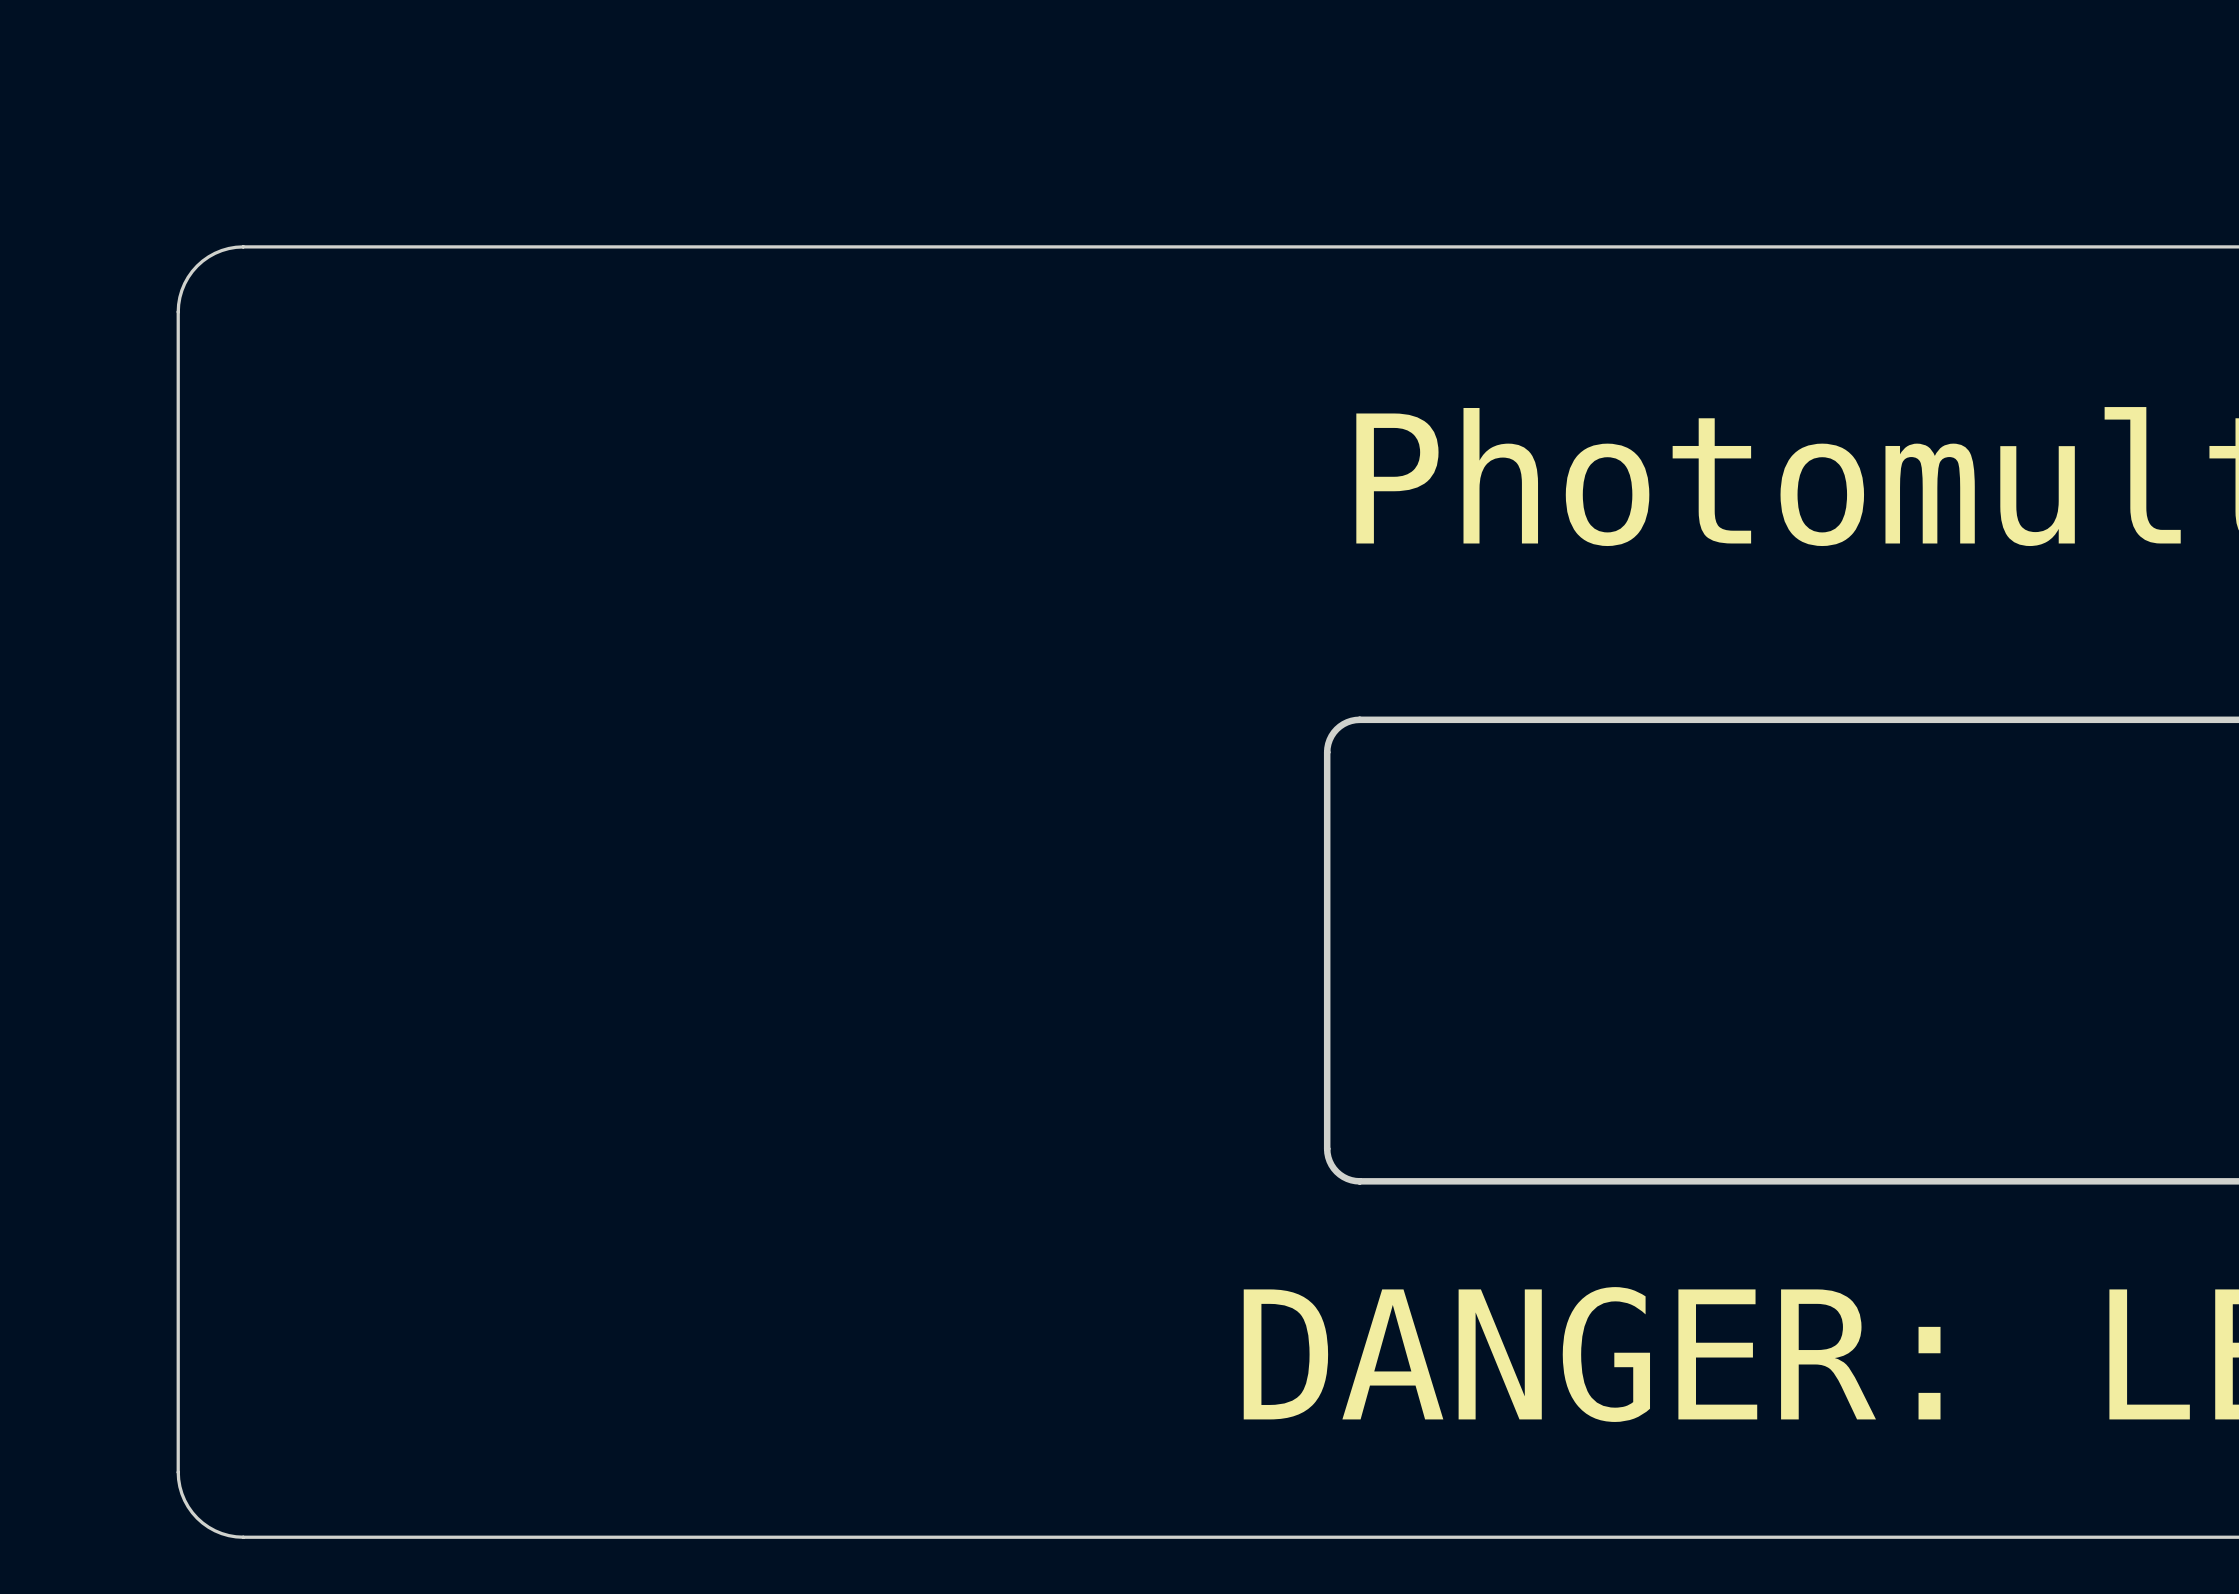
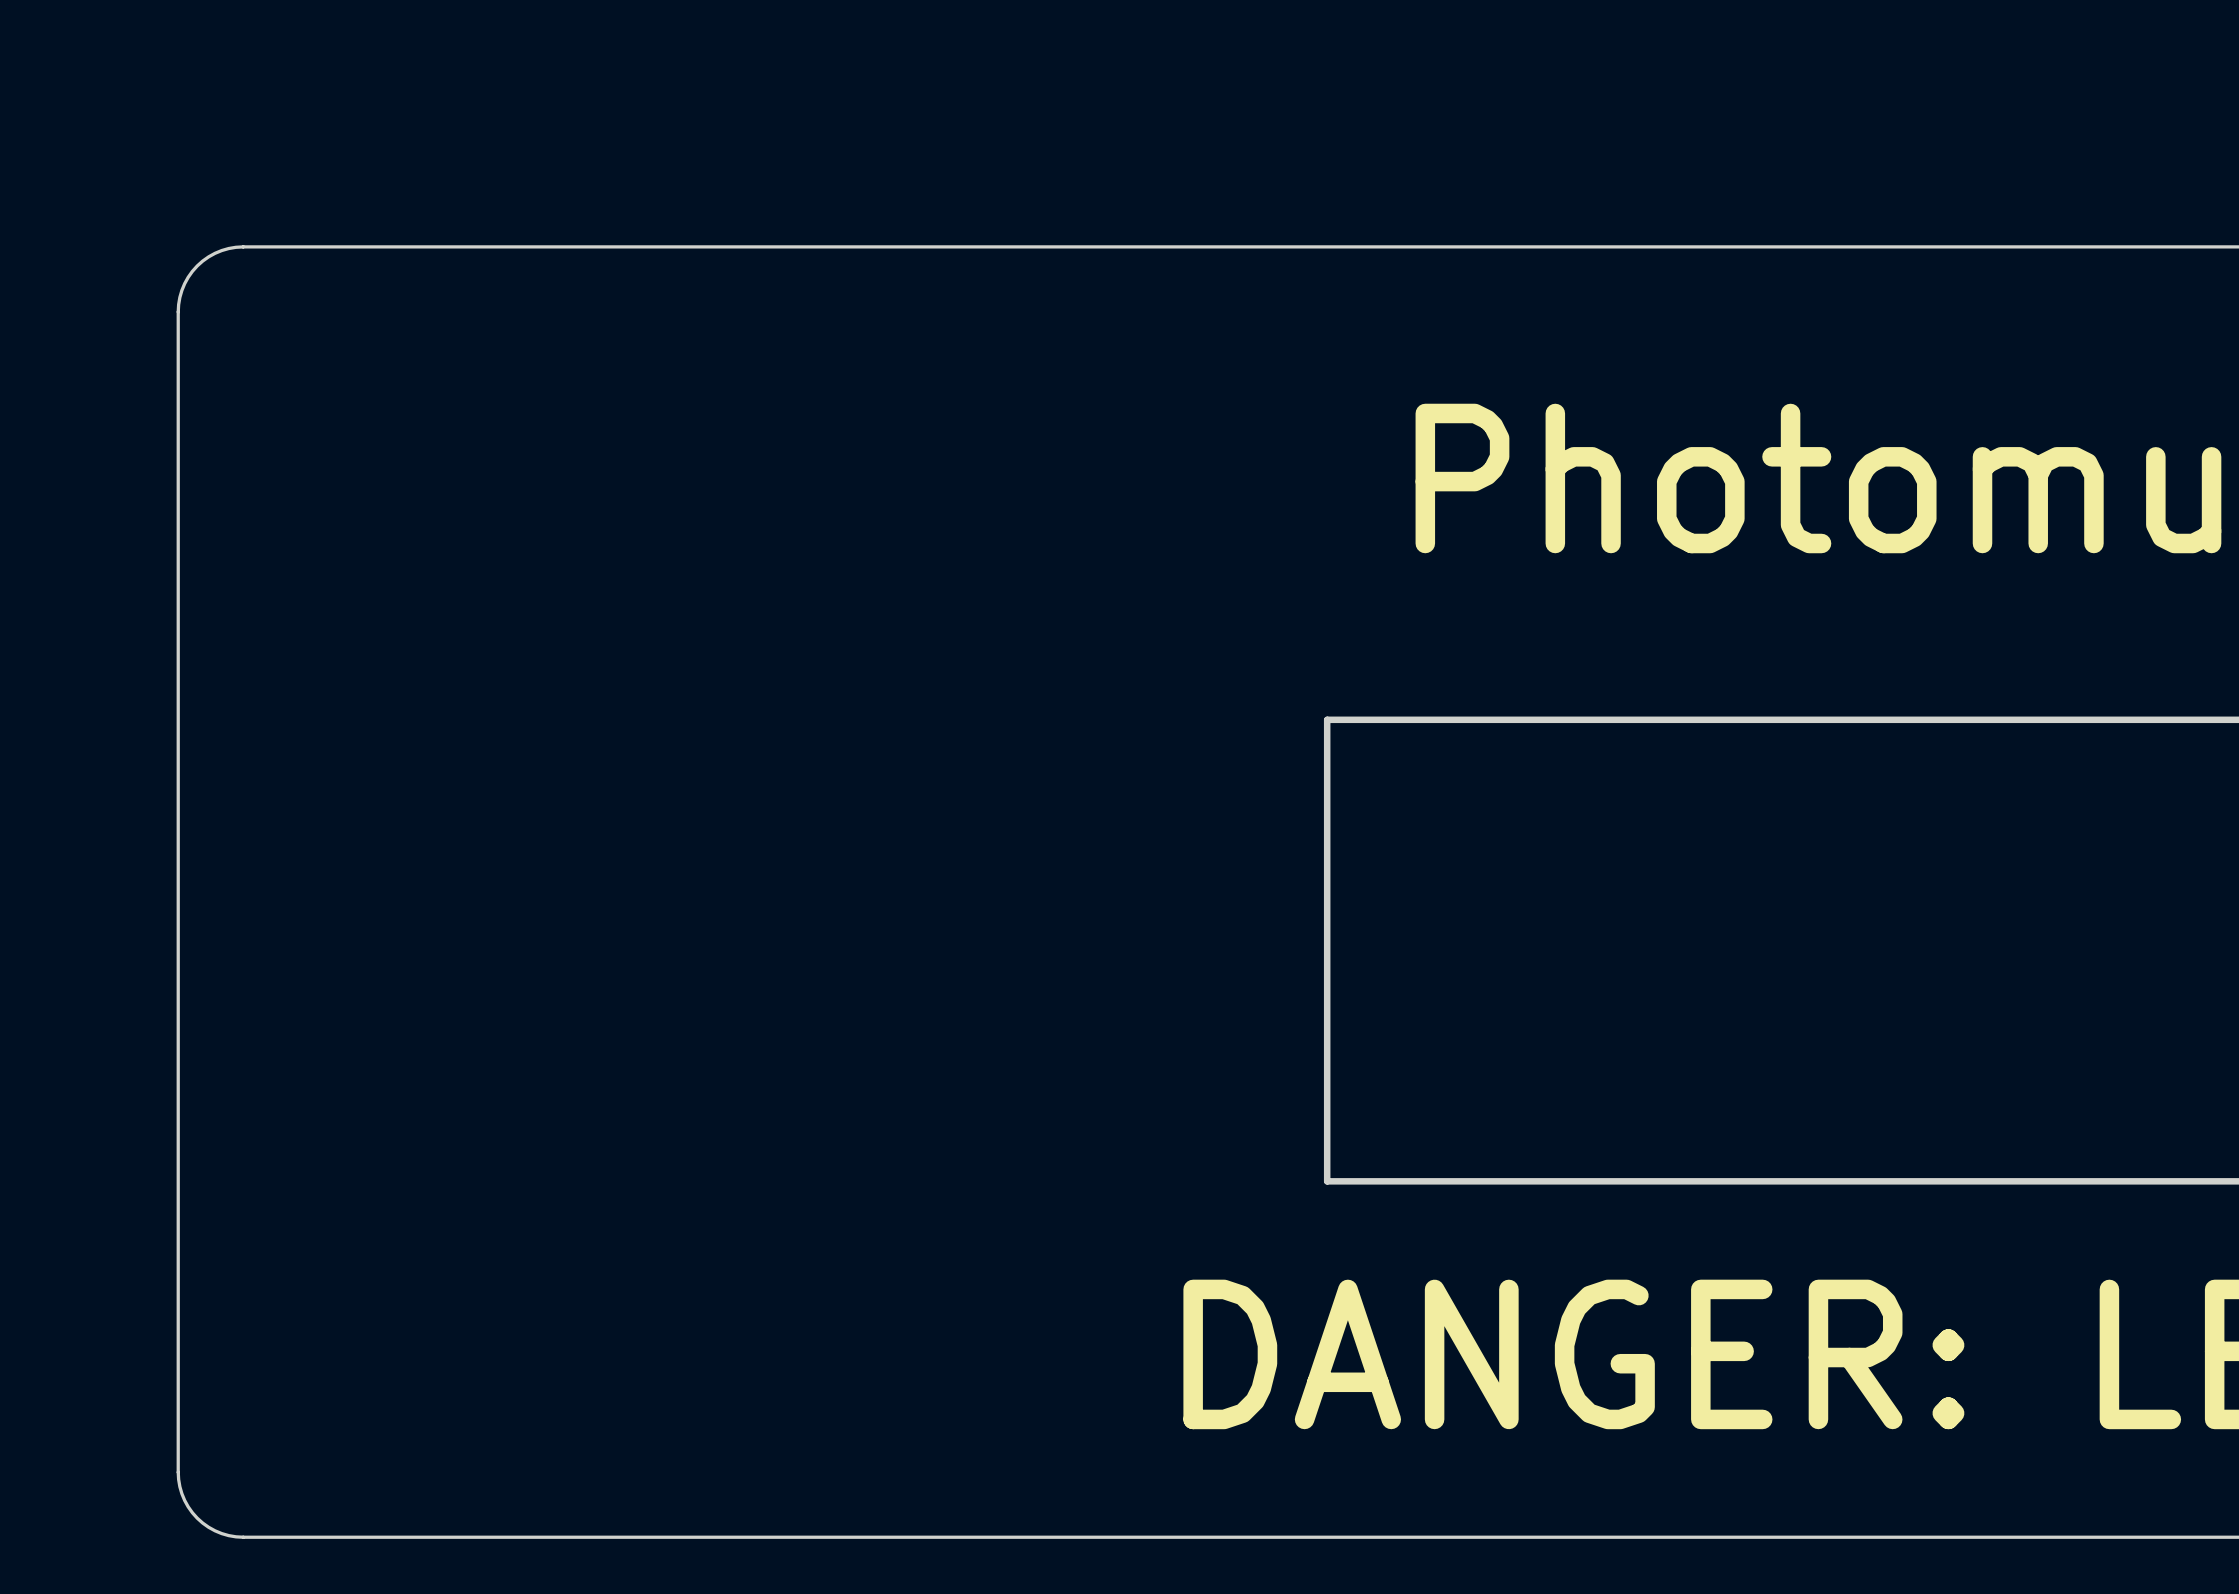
board edge: (1359, 719) (1347, 722) (1336, 729) (1329, 739) (1327, 752) -> (1359, 719) (1327, 719) (1327, 752)
board edge: (1327, 1148) (1329, 1161) (1336, 1171) (1347, 1178) (1359, 1181) -> (1327, 1148) (1327, 1181) (1359, 1181)

